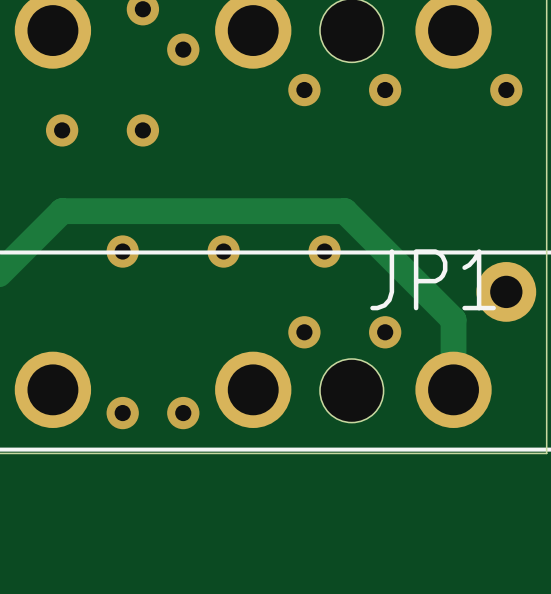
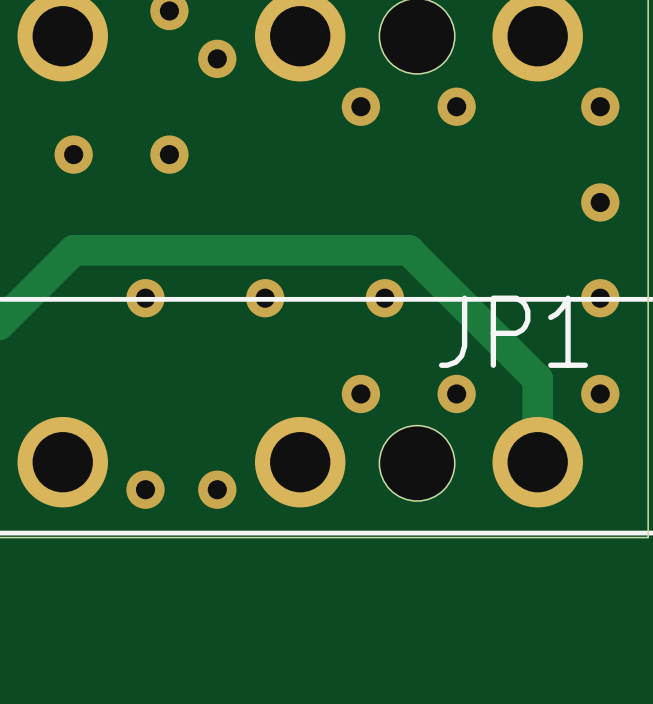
via: none -> (600, 202)
via: none -> (600, 298)
part: (506, 291) -> none
via: none -> (600, 393)

